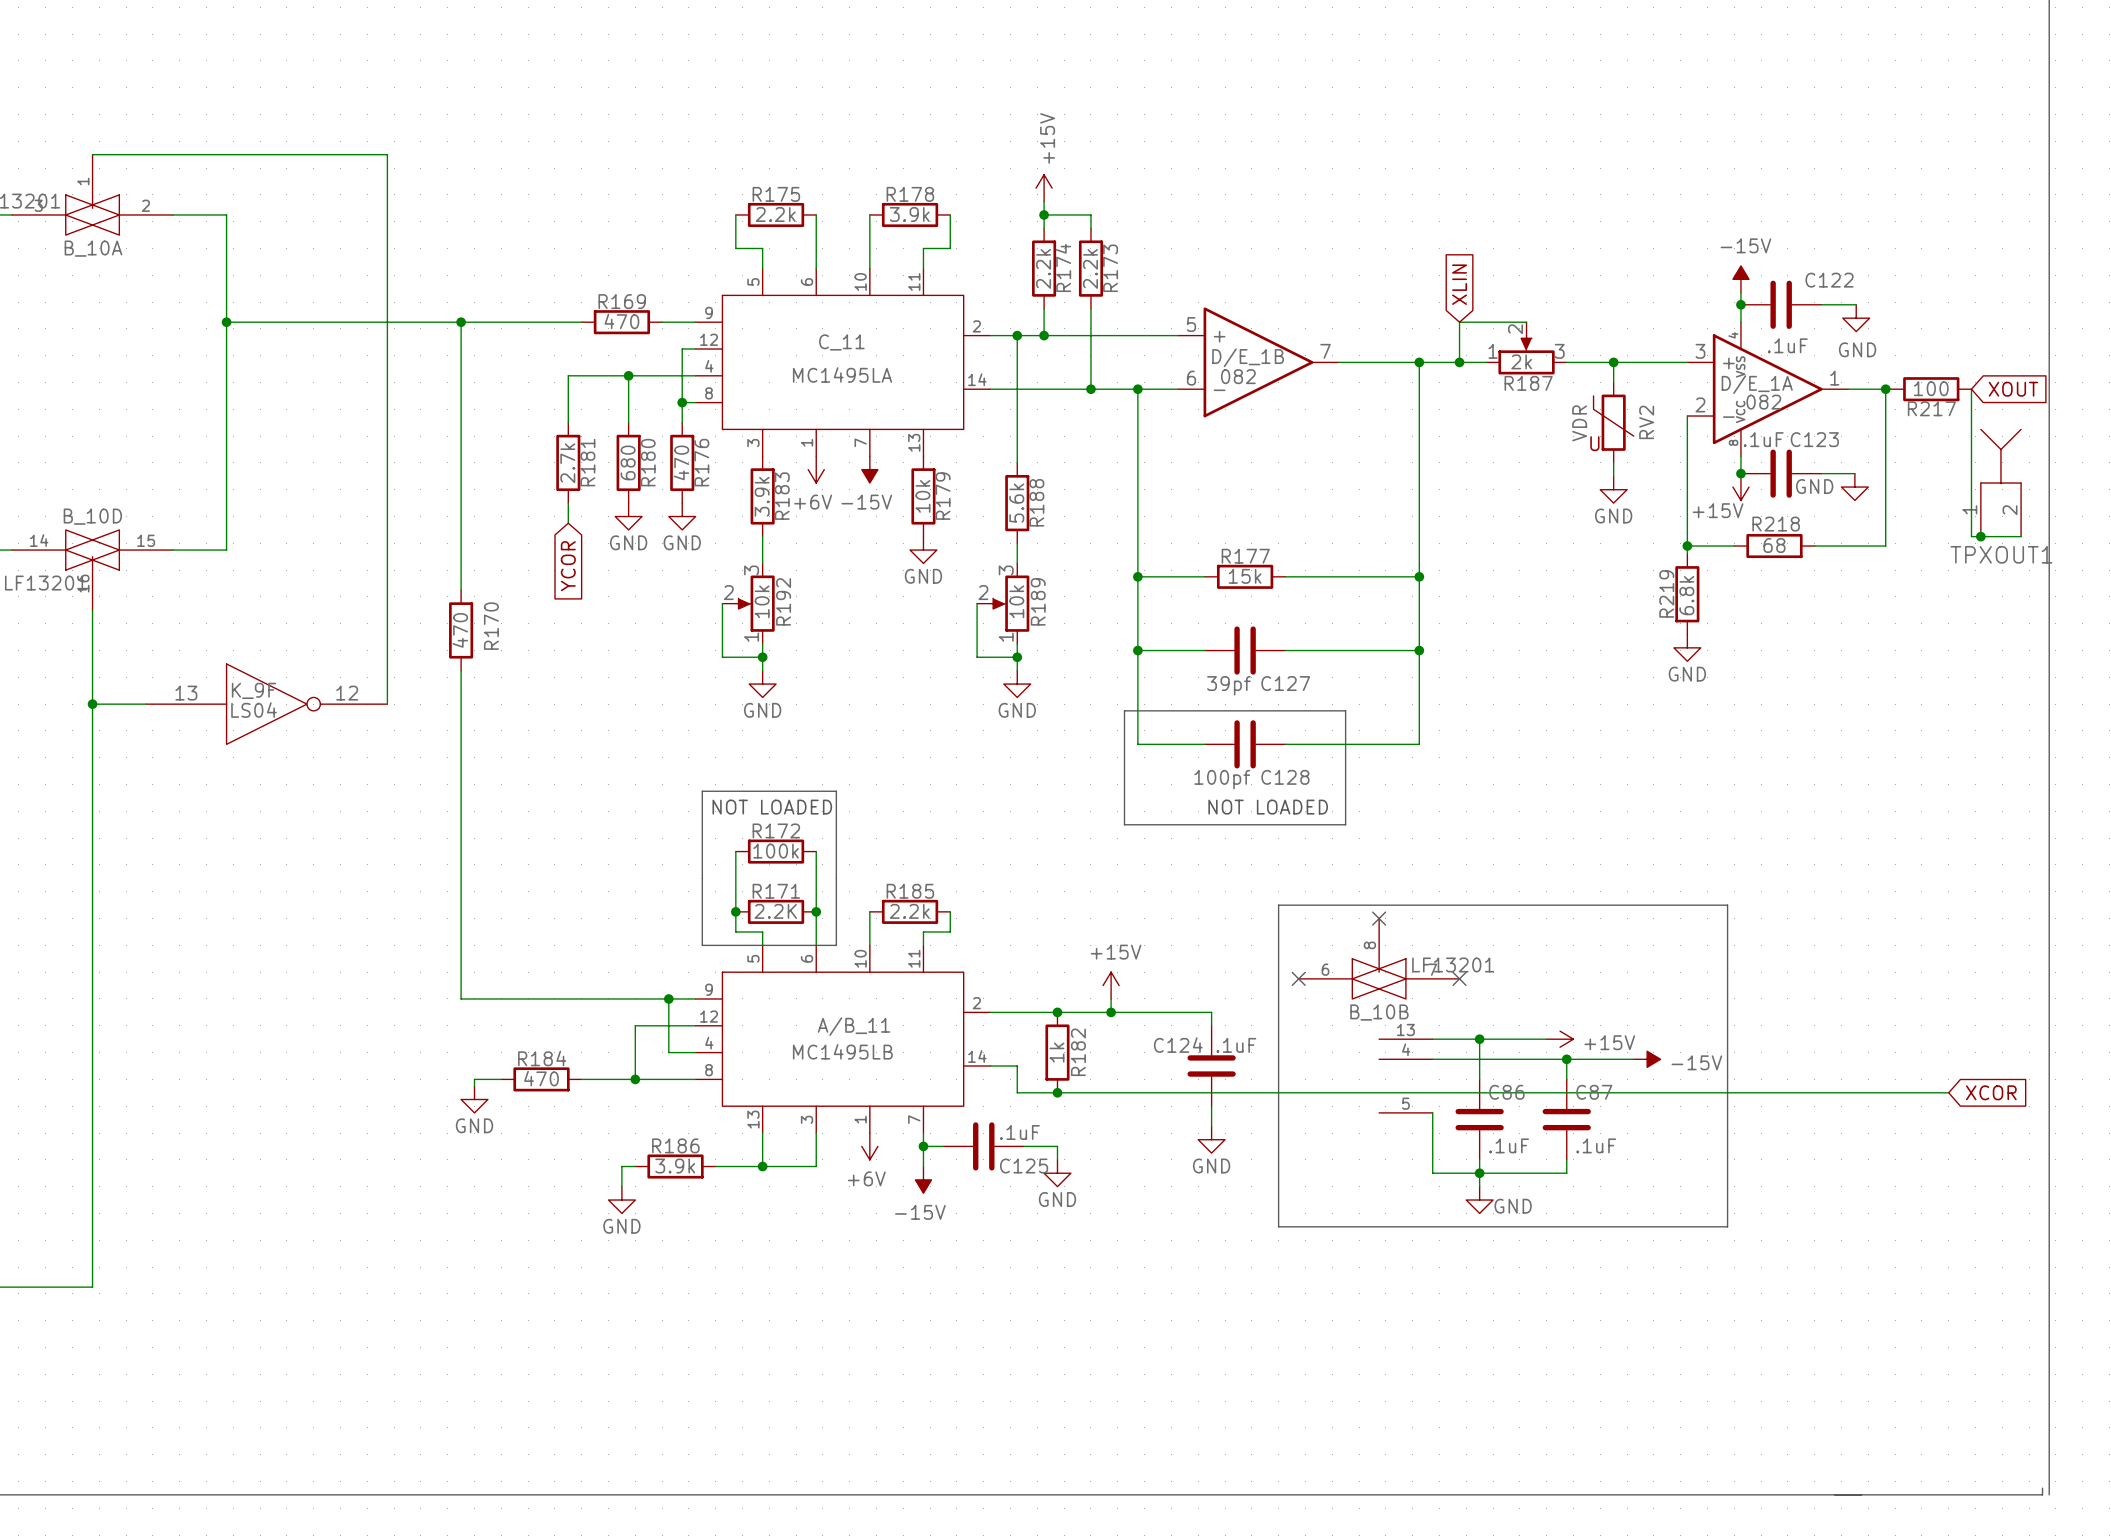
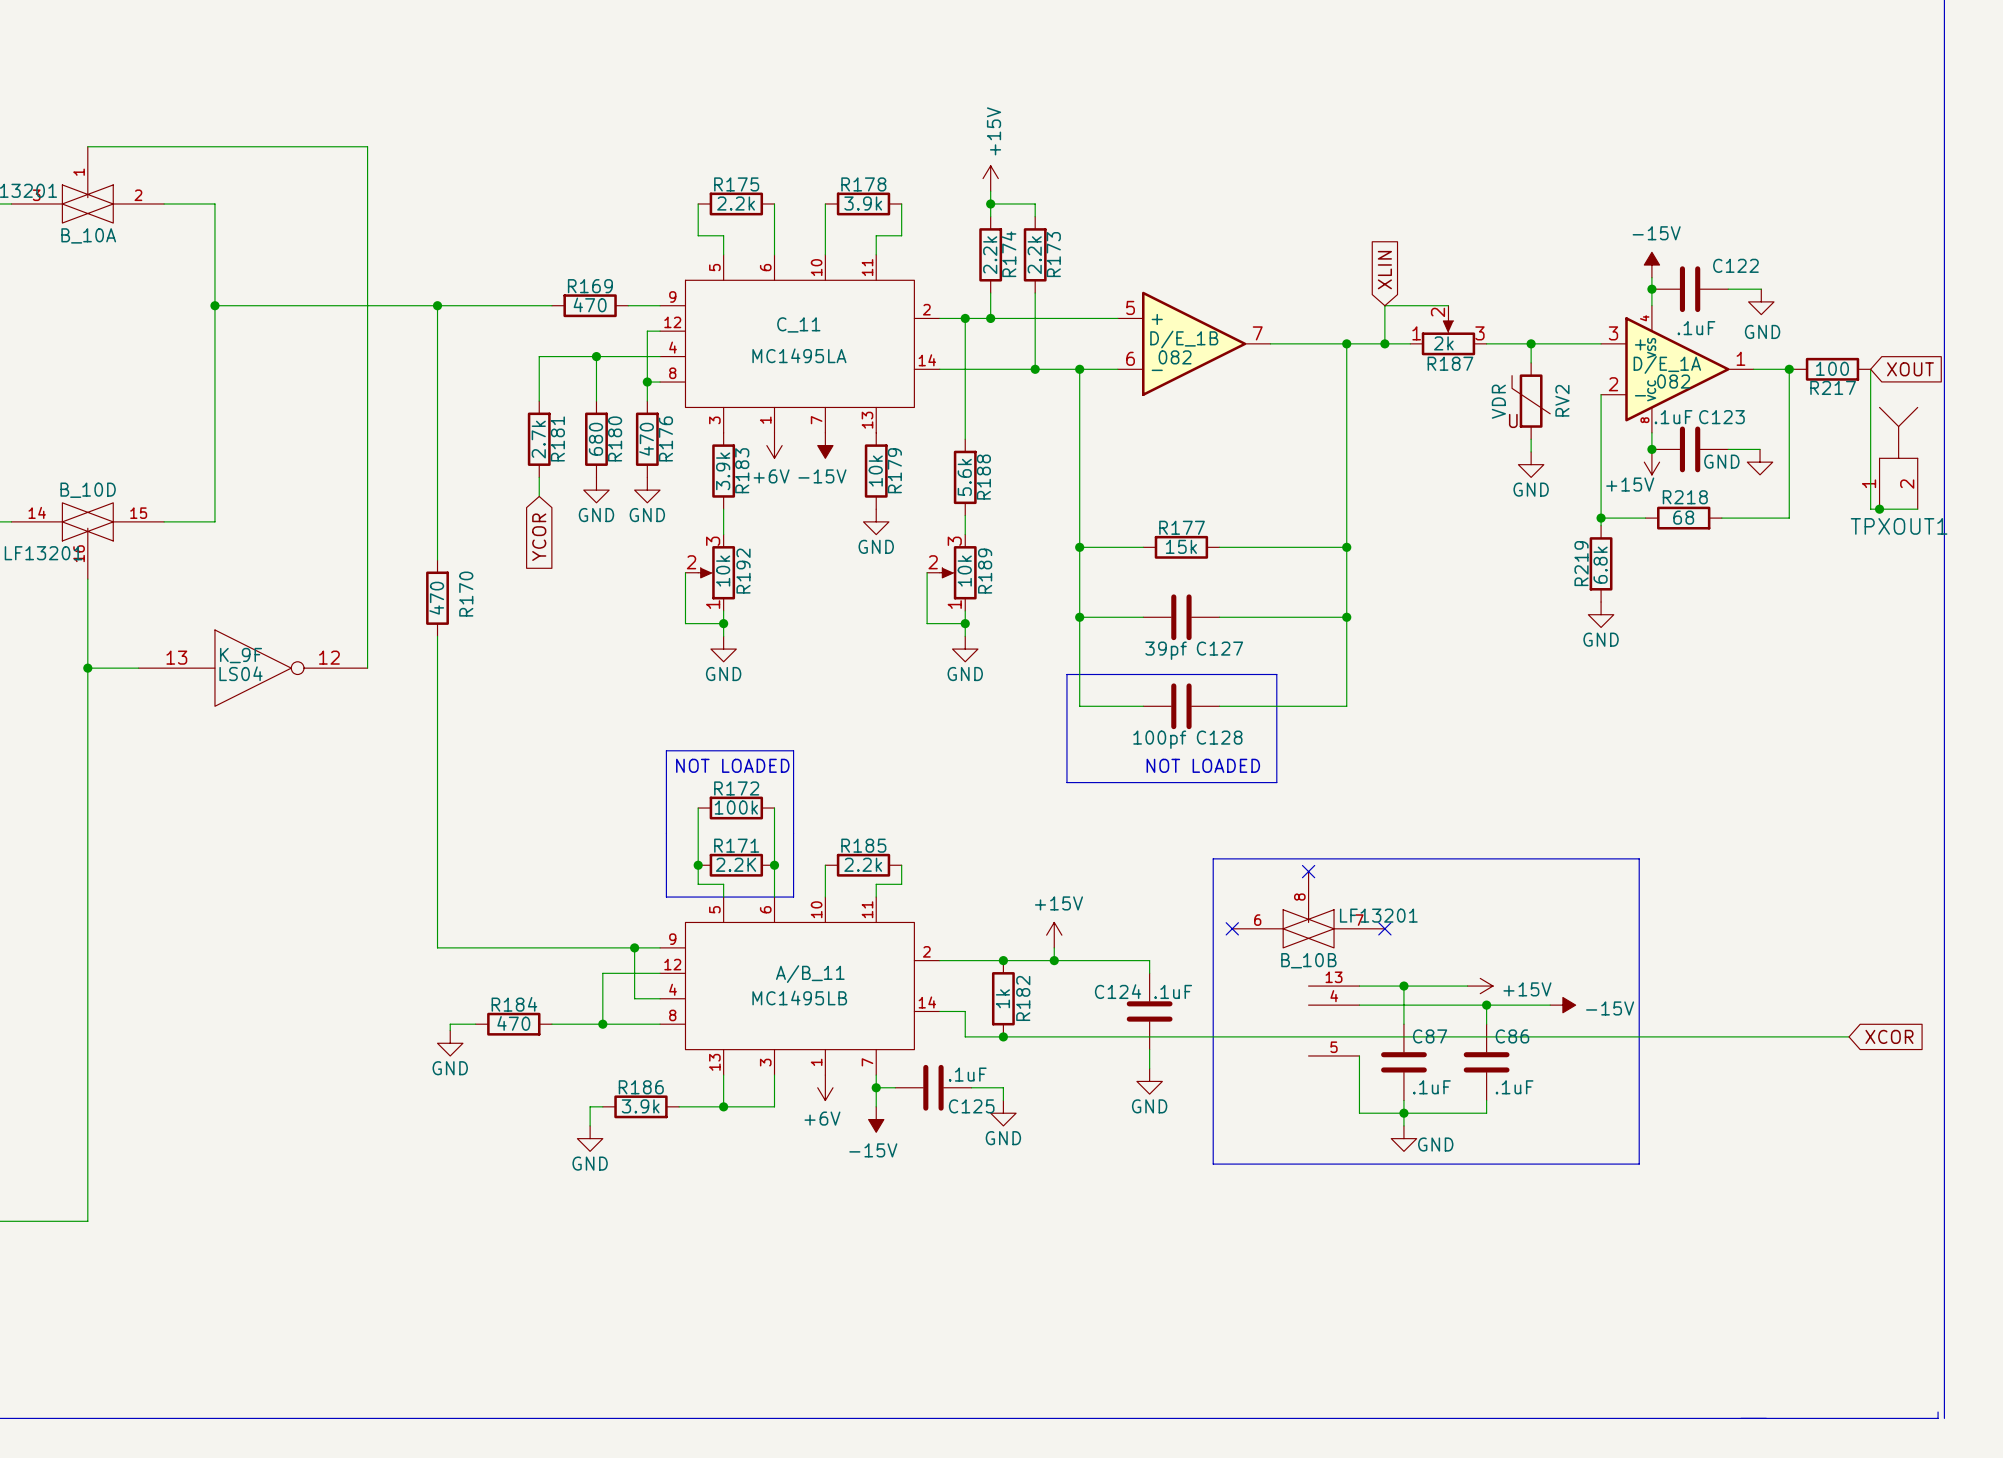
C86 name: C86 (1506, 1092) -> C87 (1430, 1036)
C87 name: C87 (1594, 1092) -> C86 (1512, 1036)

